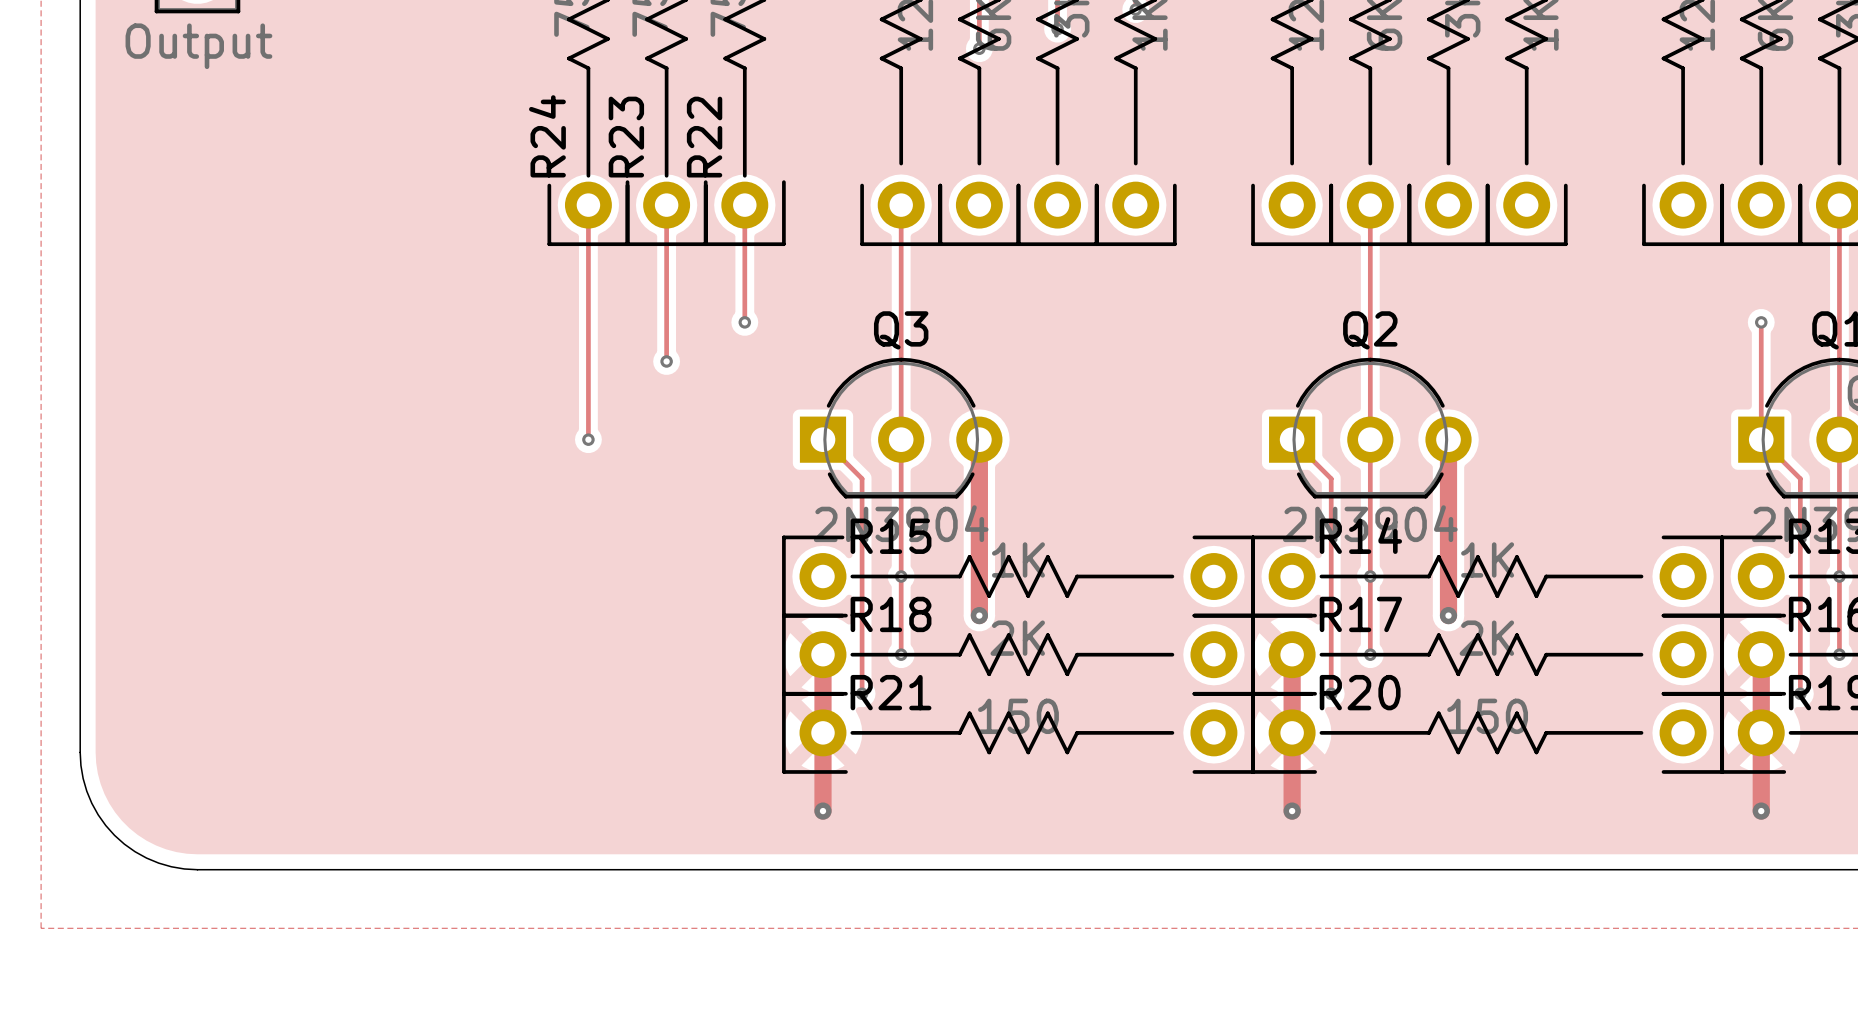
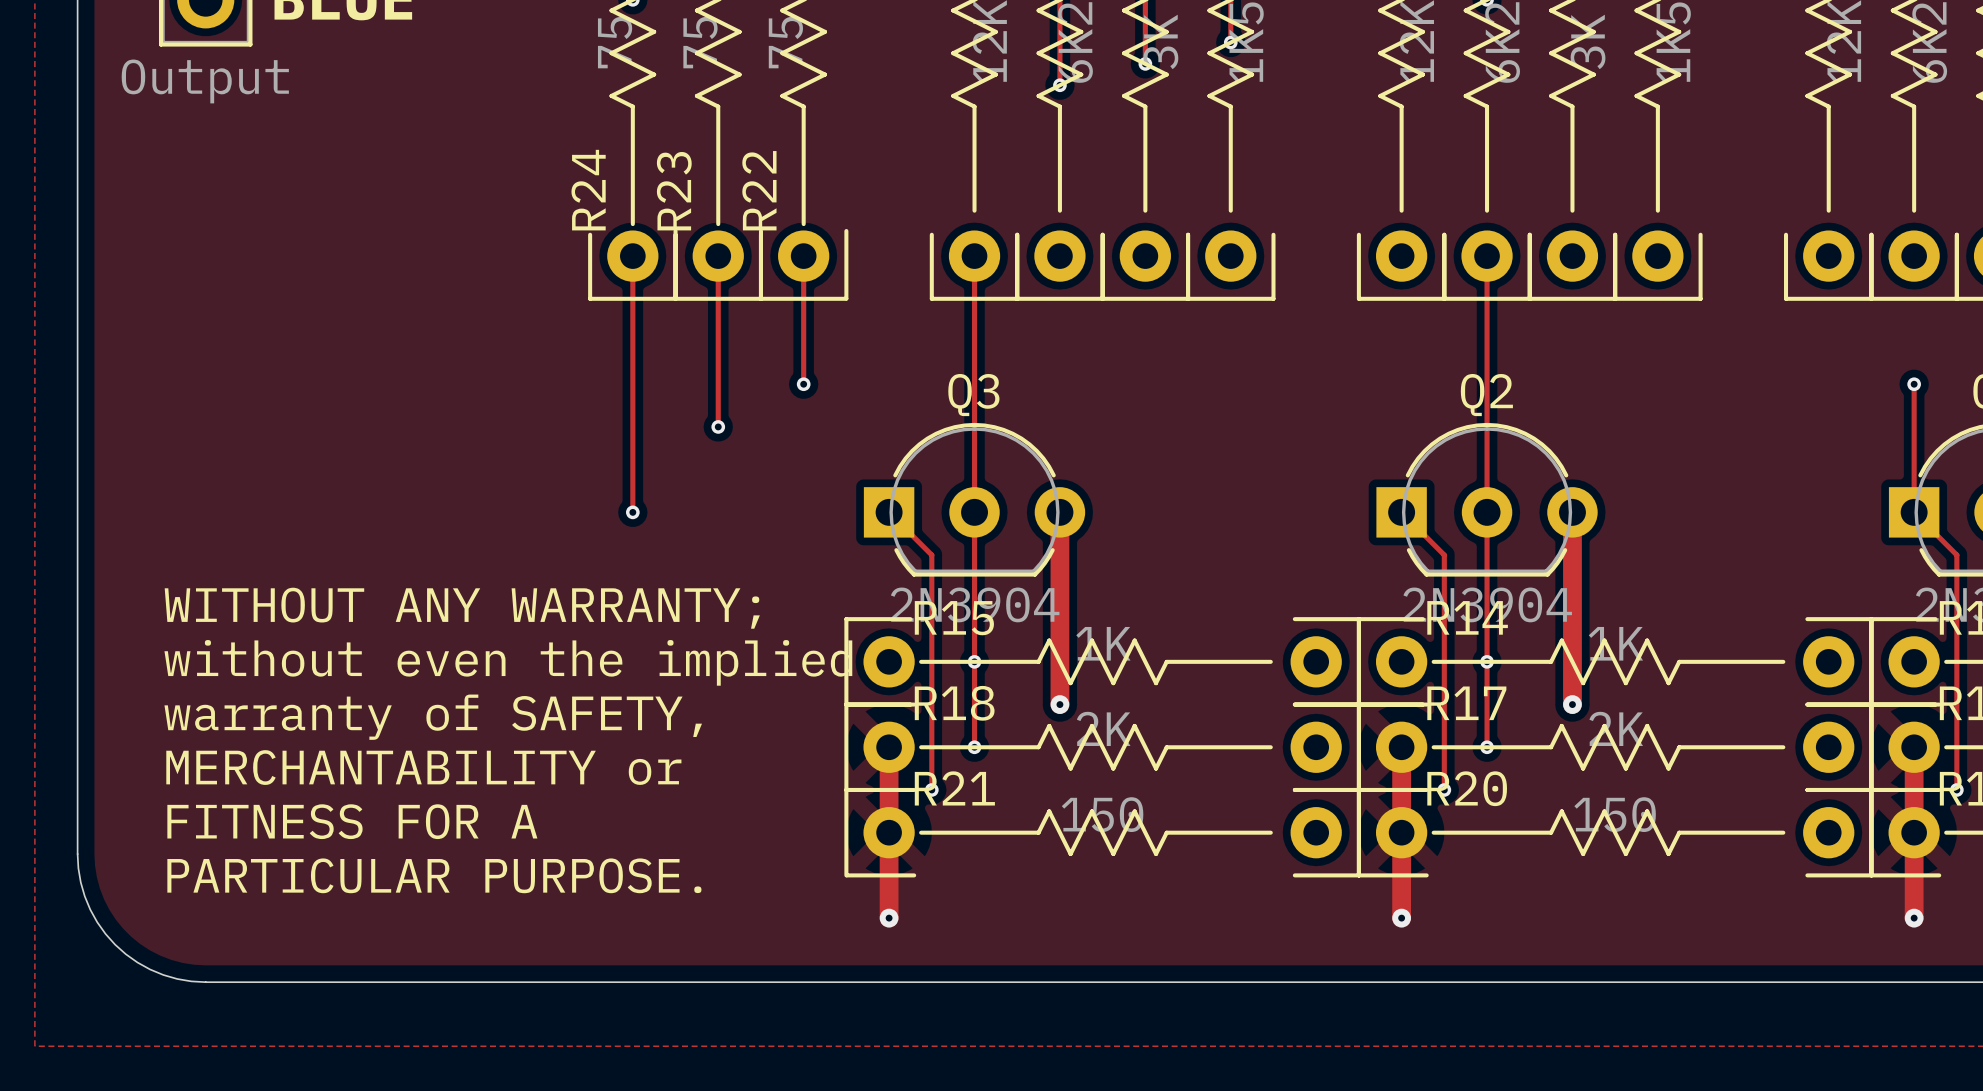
text: none -> WITHOUT ANY WARRANTY; (462, 608)
text: none -> without even the implied (508, 662)
text: none -> warranty of SAFETY, (433, 717)
text: none -> MERCHANTABILITY or (423, 767)
text: none -> FITNESS FOR A (352, 821)
text: none -> PARTICULAR PURPOSE. (434, 875)

